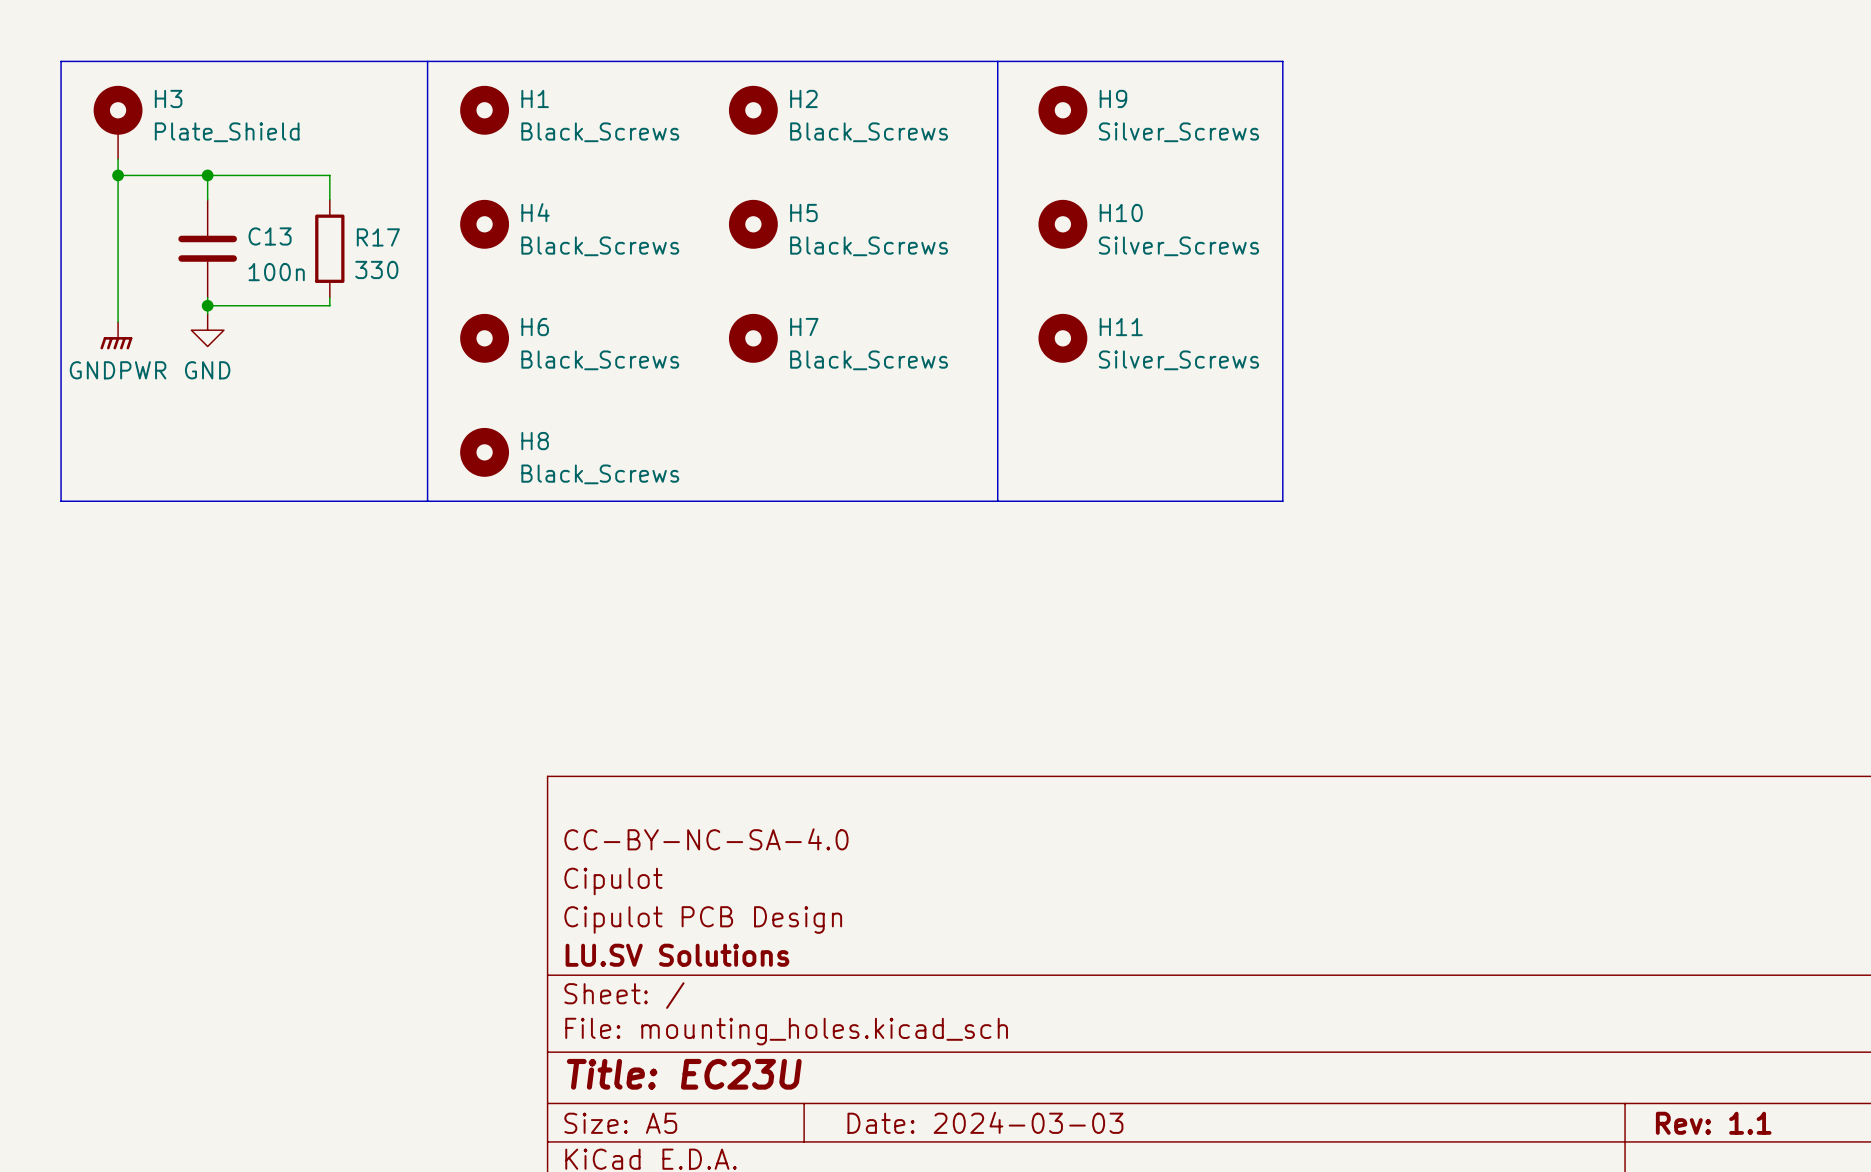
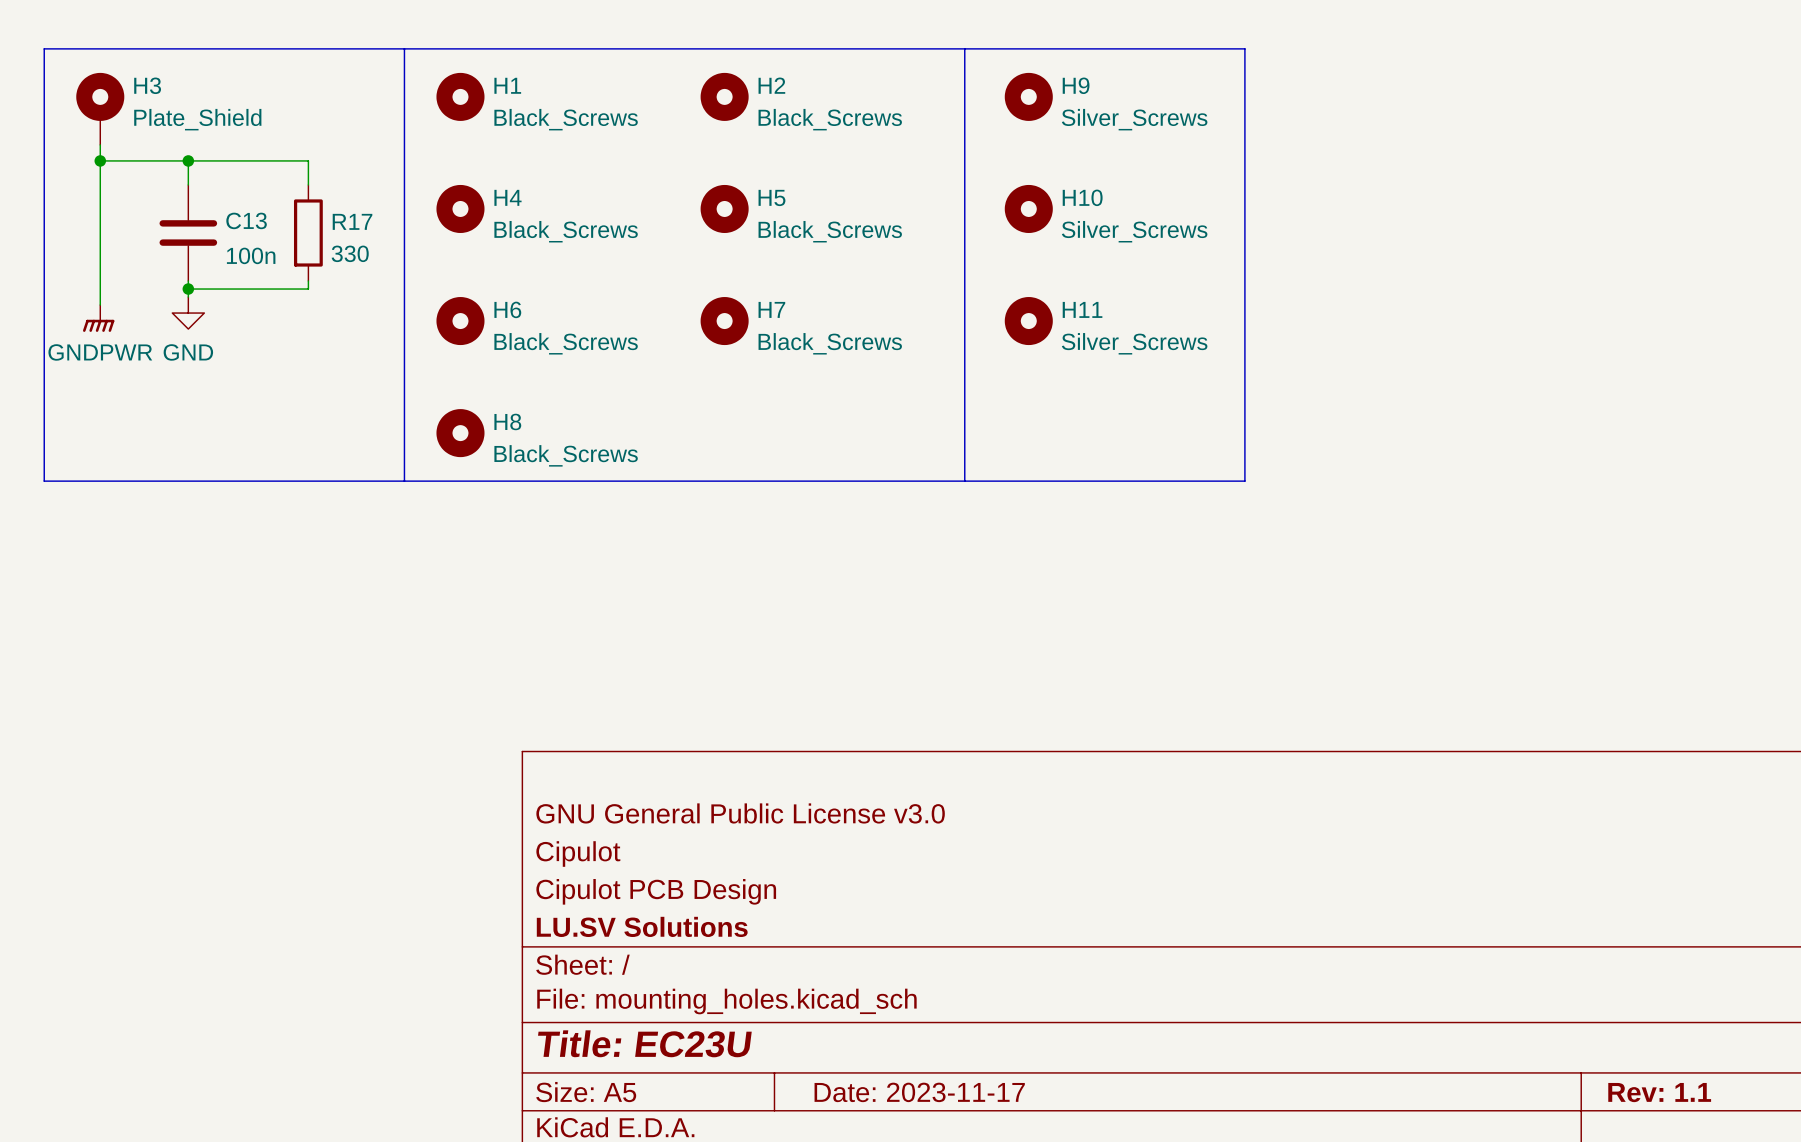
title block: CC-BY-NC-SA-4.0 (706, 839) -> GNU General Public License v3.0 (740, 813)
title block: Date: 2024-03-03 (985, 1122) -> Date: 2023-11-17 (919, 1092)

